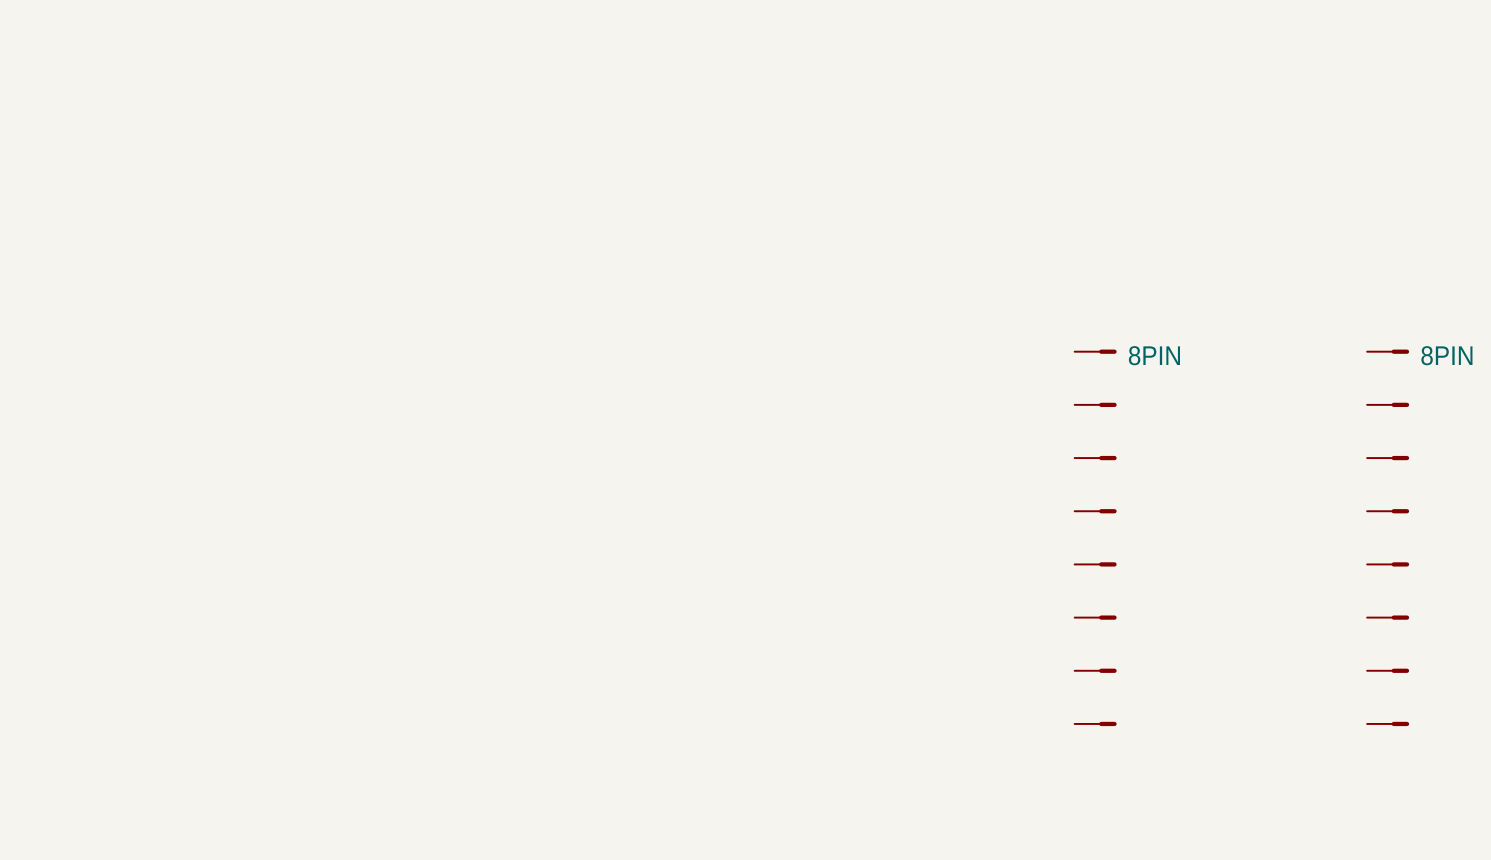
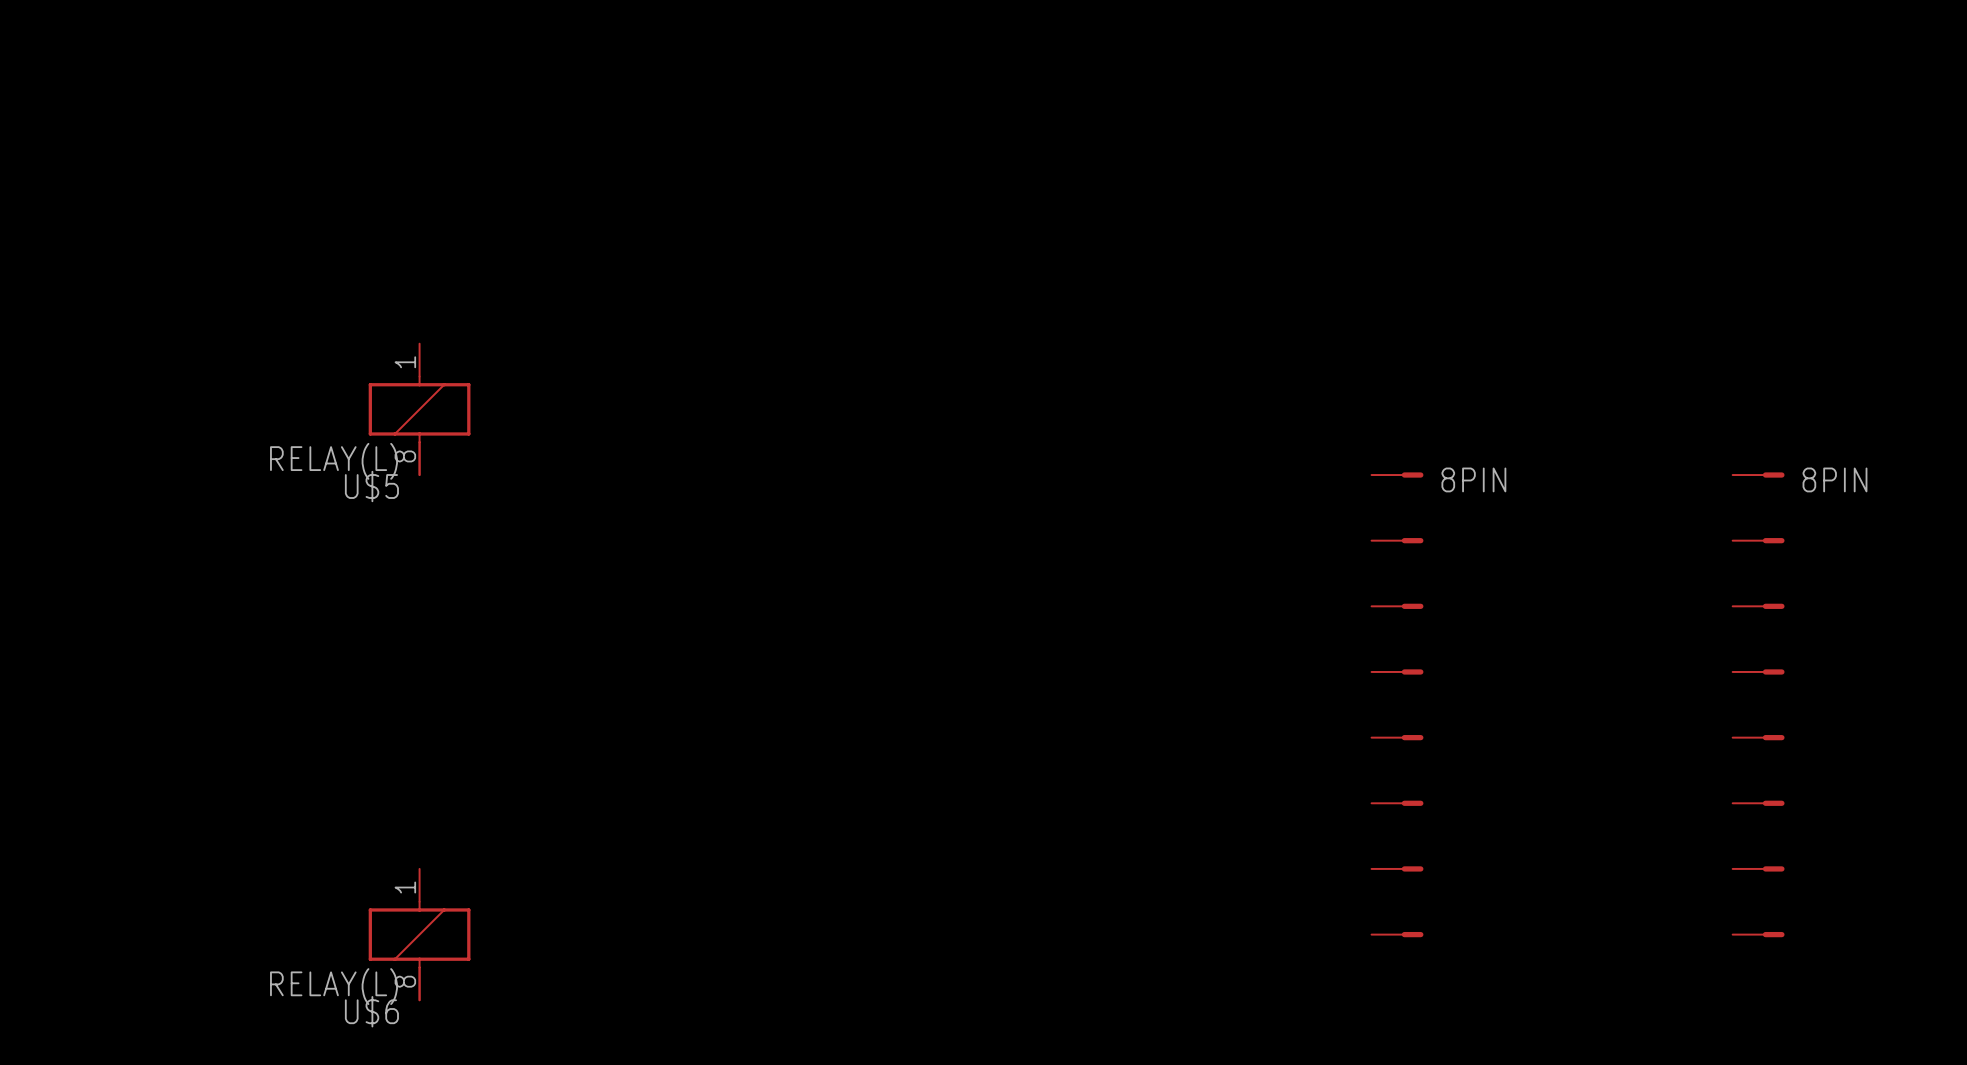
U$5: none -> RELAY(L) (419, 409)
U$6: none -> RELAY(L) (419, 935)

